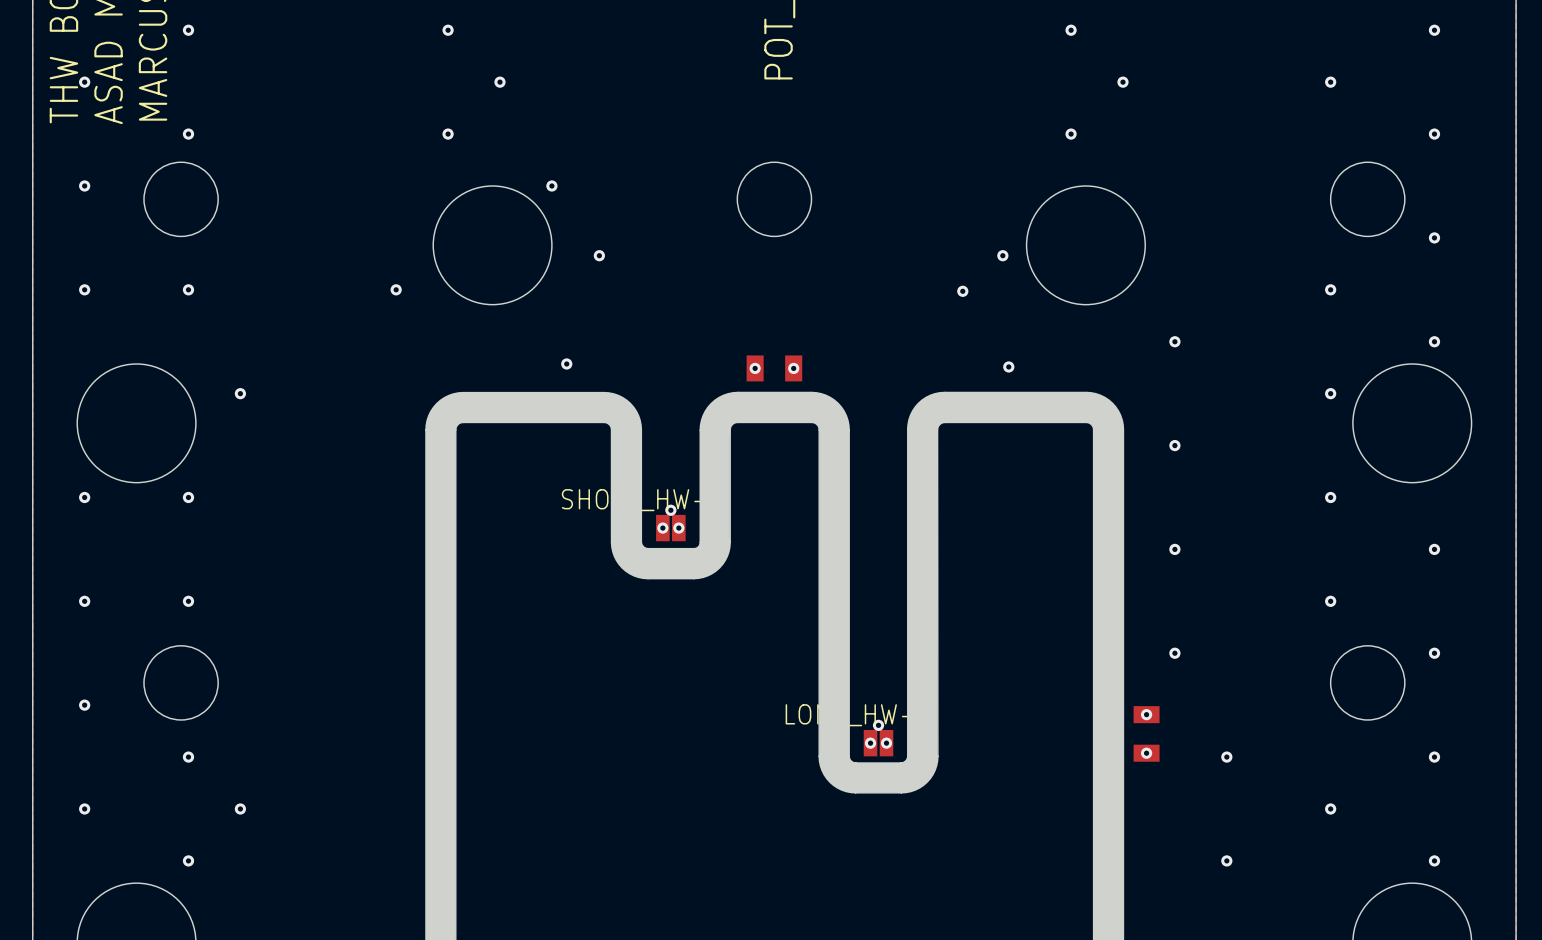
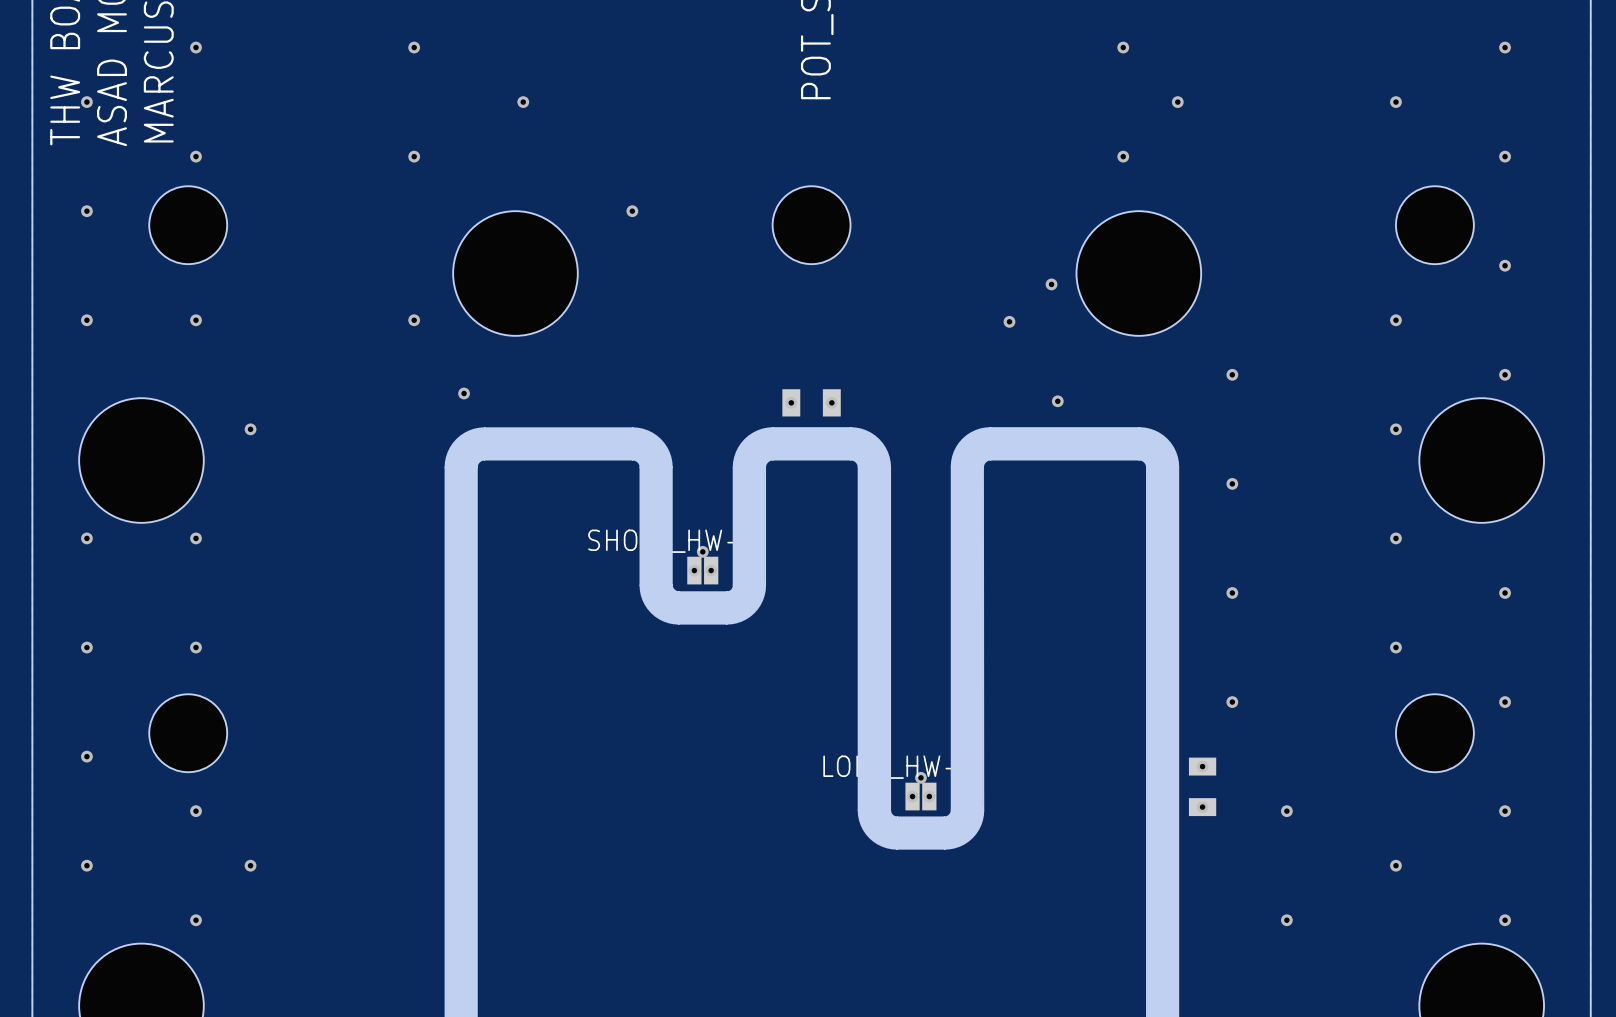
via position: (448, 30) -> (414, 47)
via position: (448, 134) -> (414, 156)
via: (551, 185) -> none
via: none -> (632, 211)
via: (599, 255) -> none
via: none -> (464, 393)
via: (566, 363) -> none

